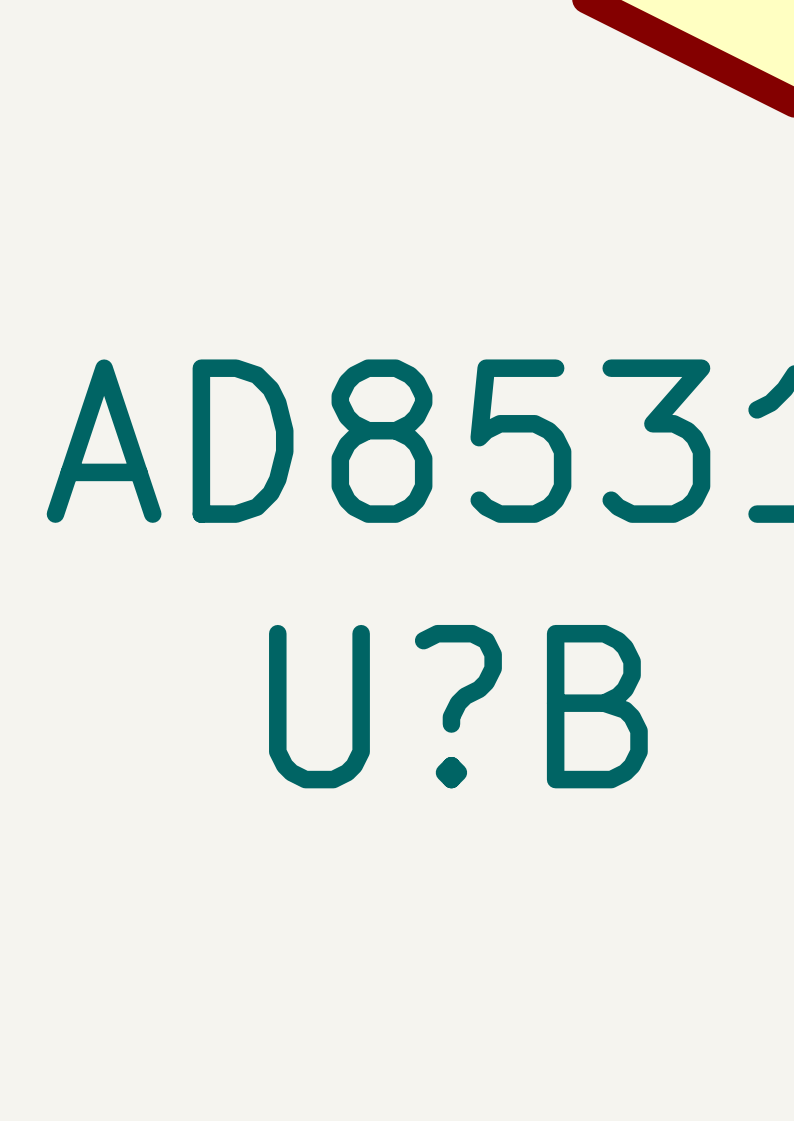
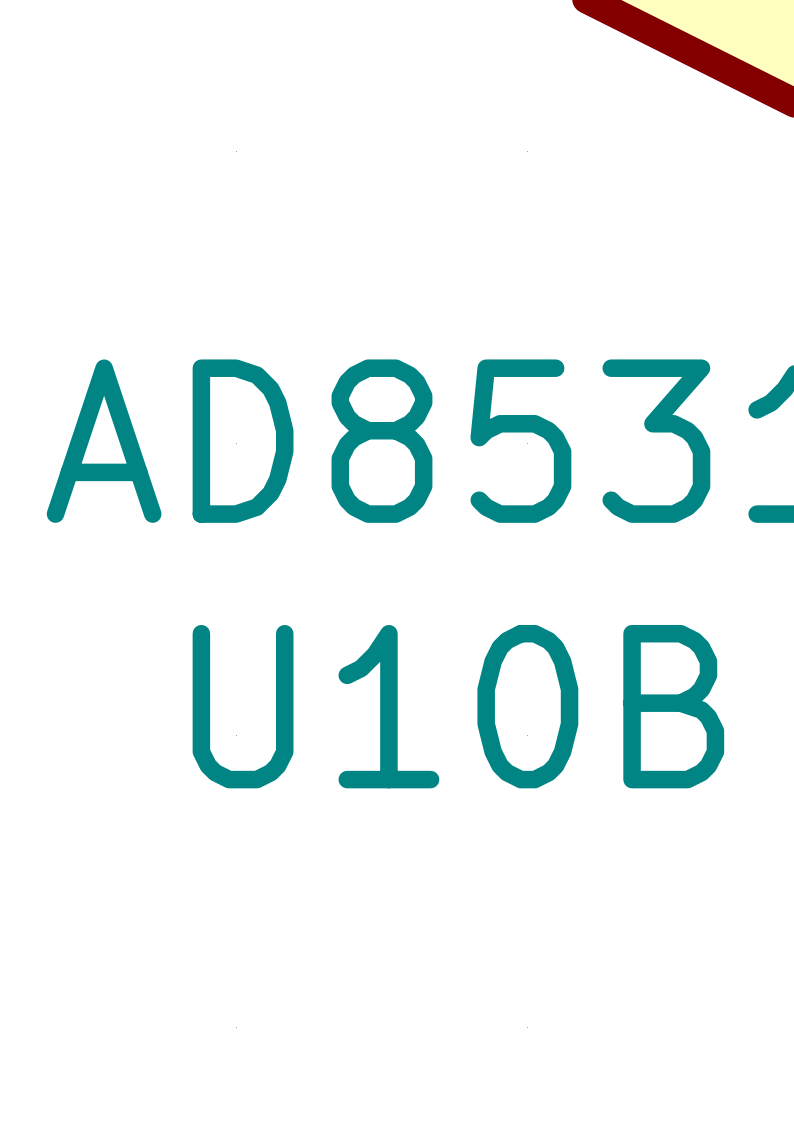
U?B name: U?B (458, 706) -> U10B (458, 706)

